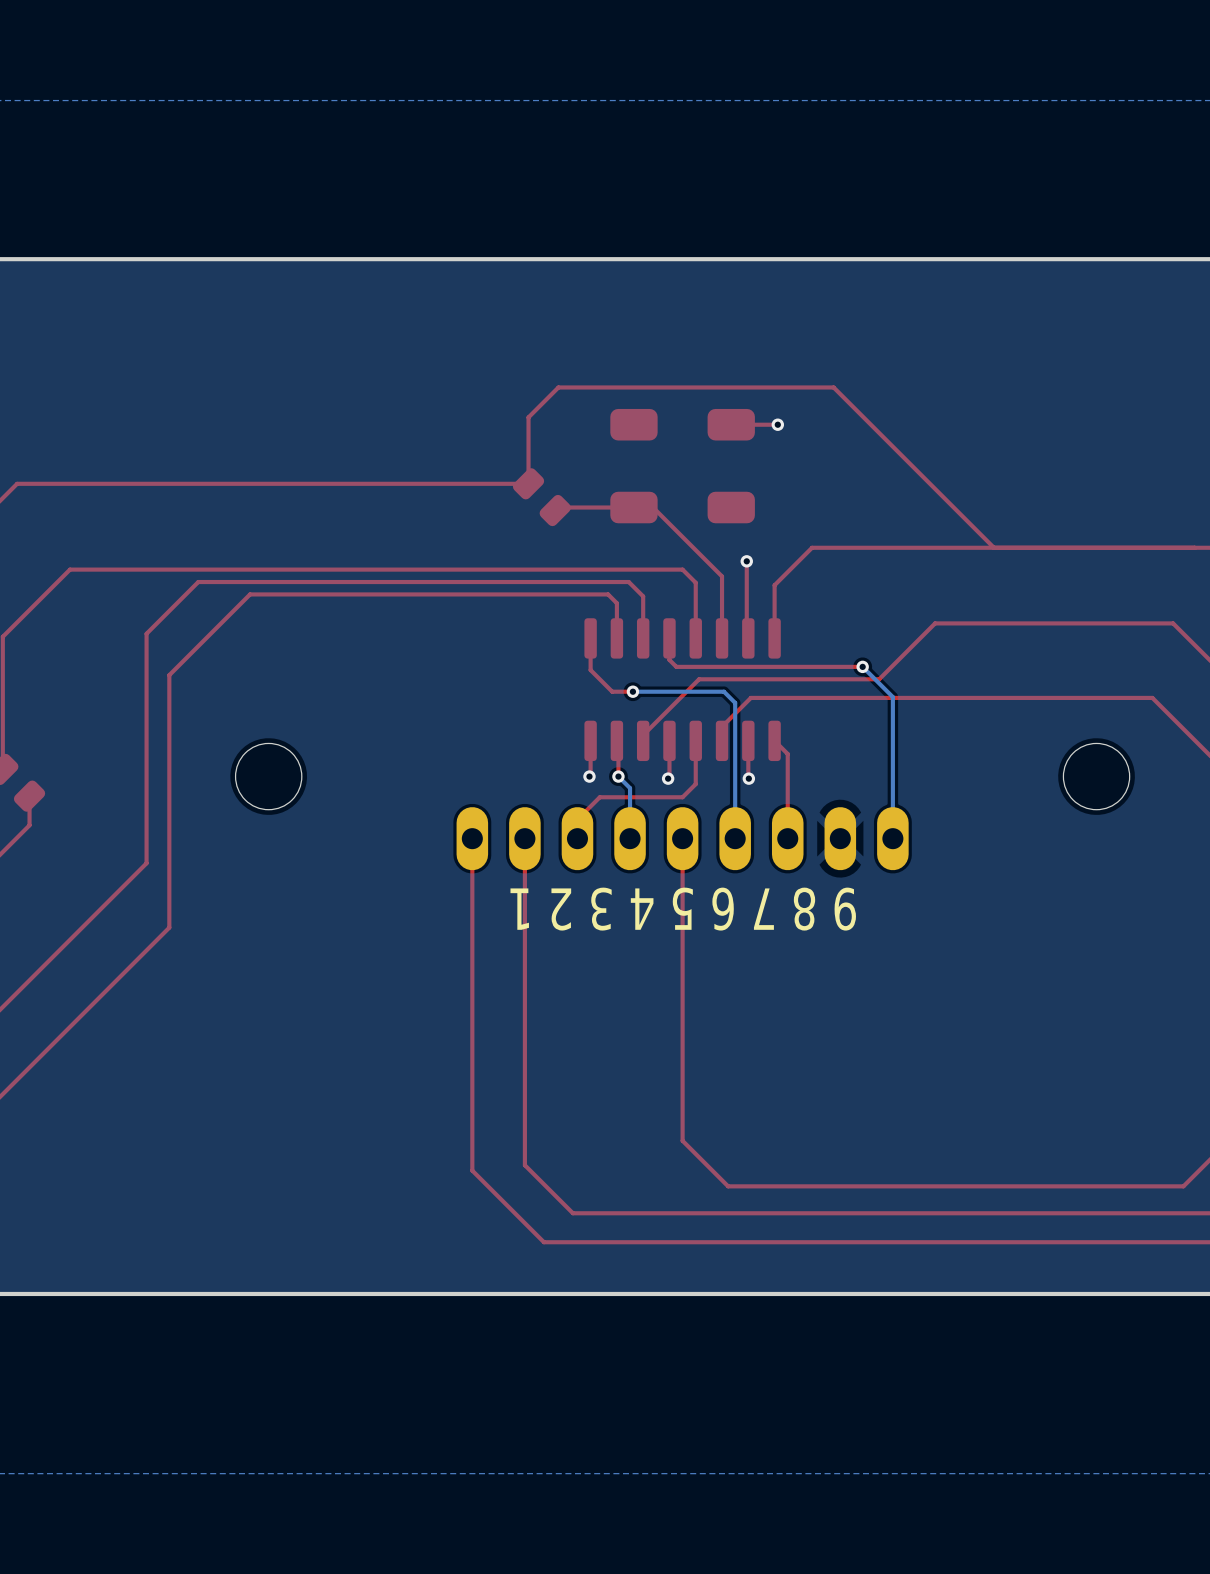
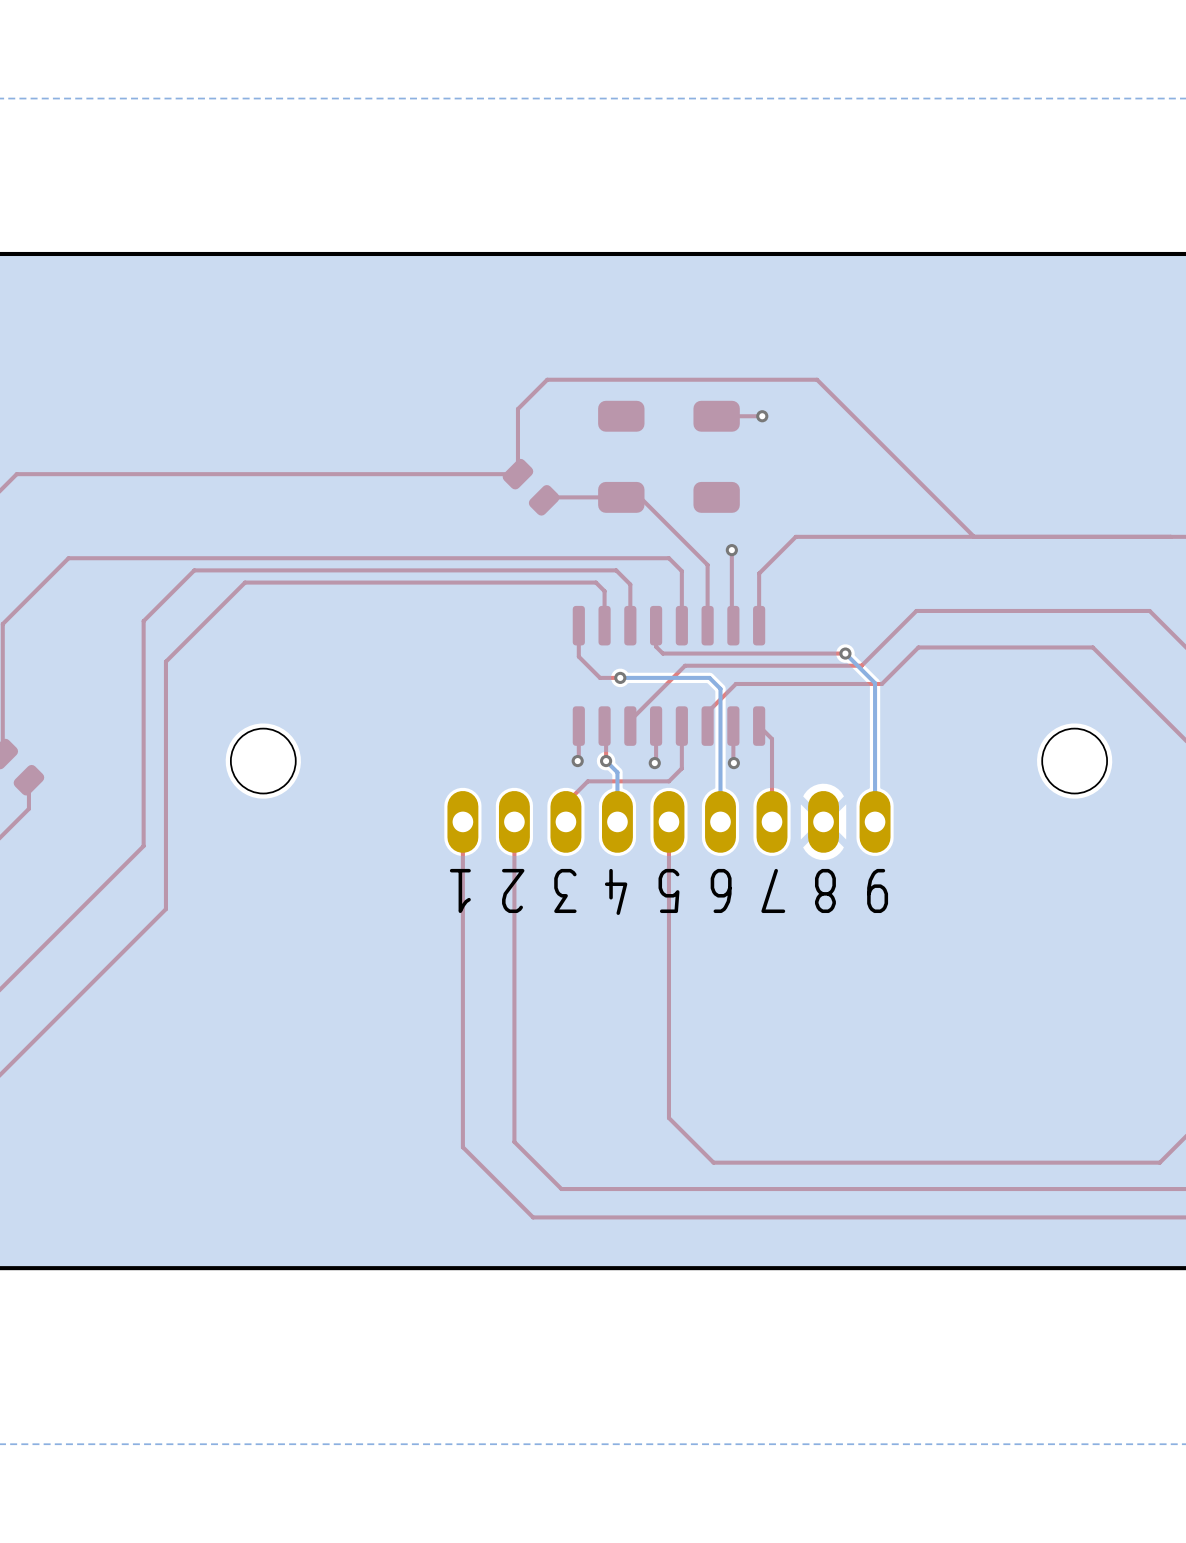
top track: (1152, 697) (899, 697) -> (1129, 683) (1092, 647) (918, 647) (881, 683)

